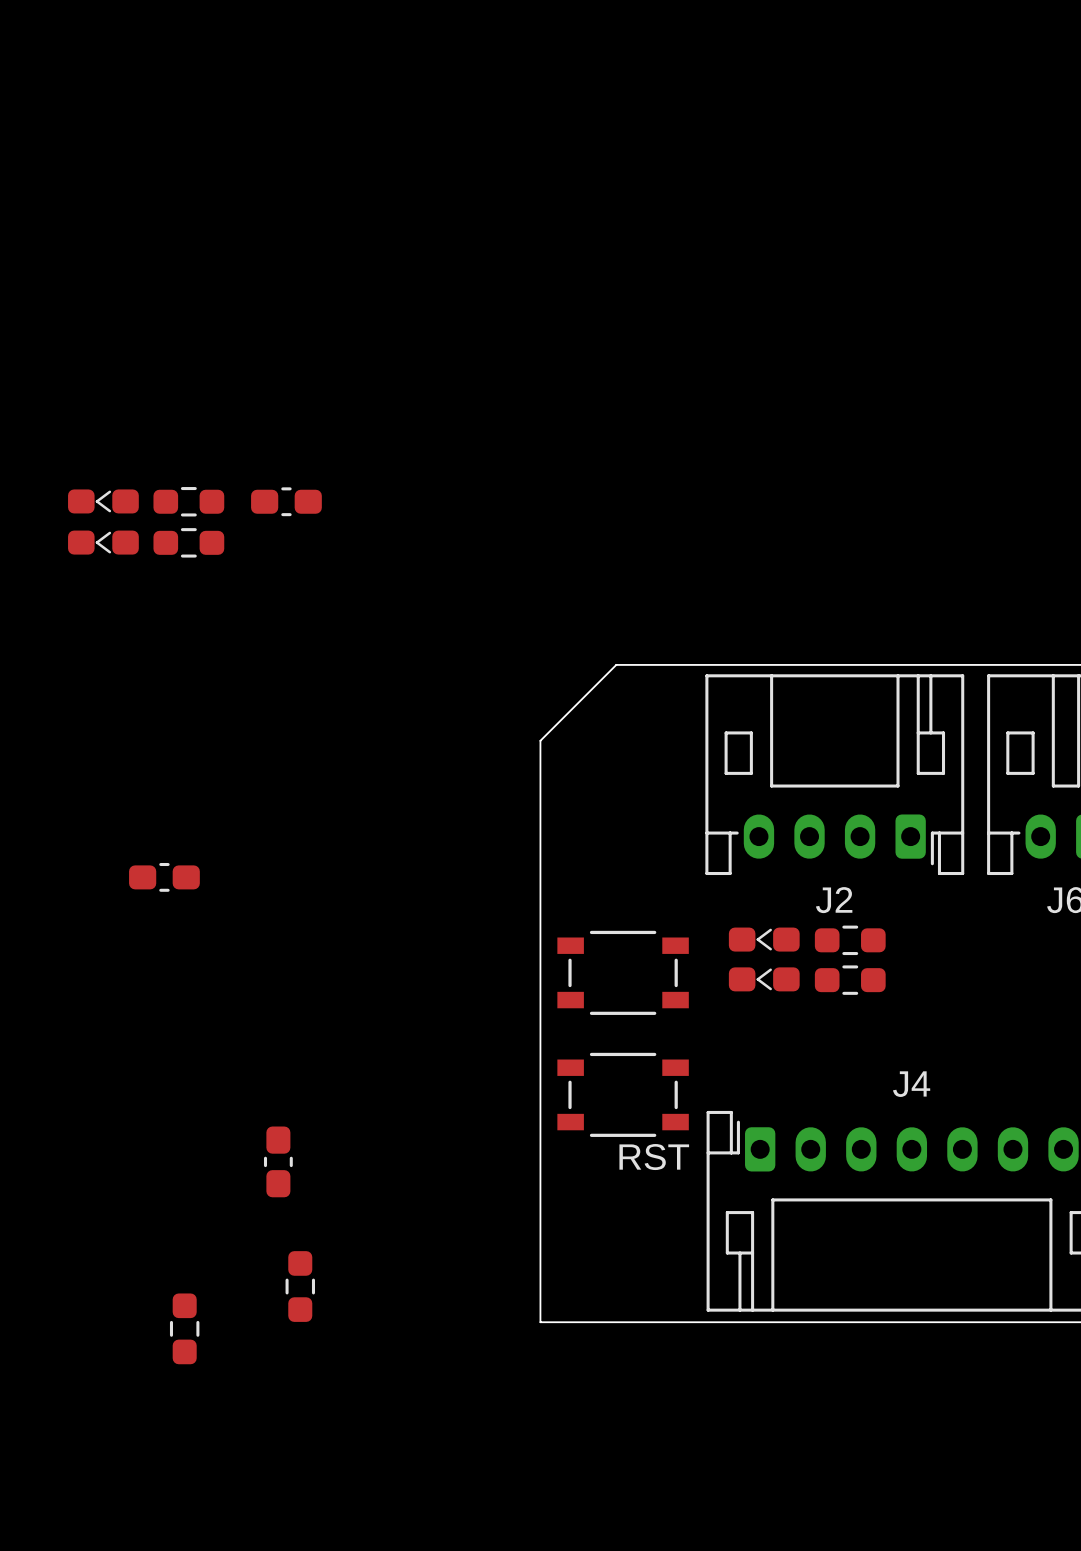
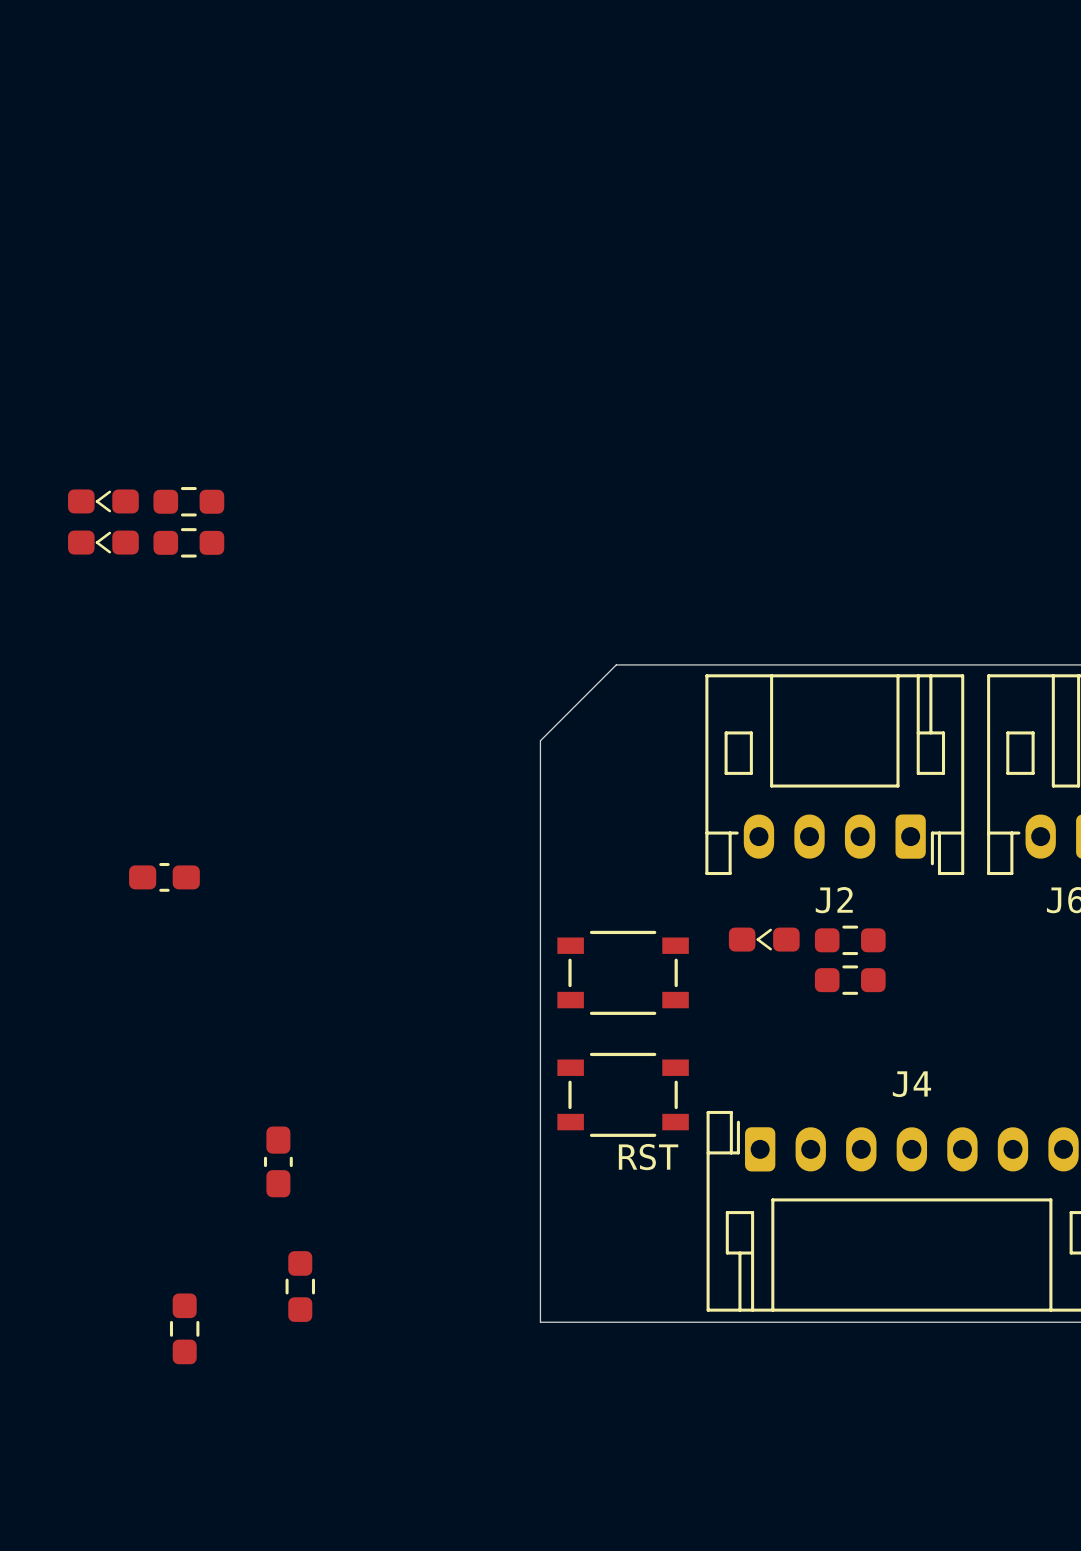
part: (286, 501) -> none
part: (764, 979) -> none

